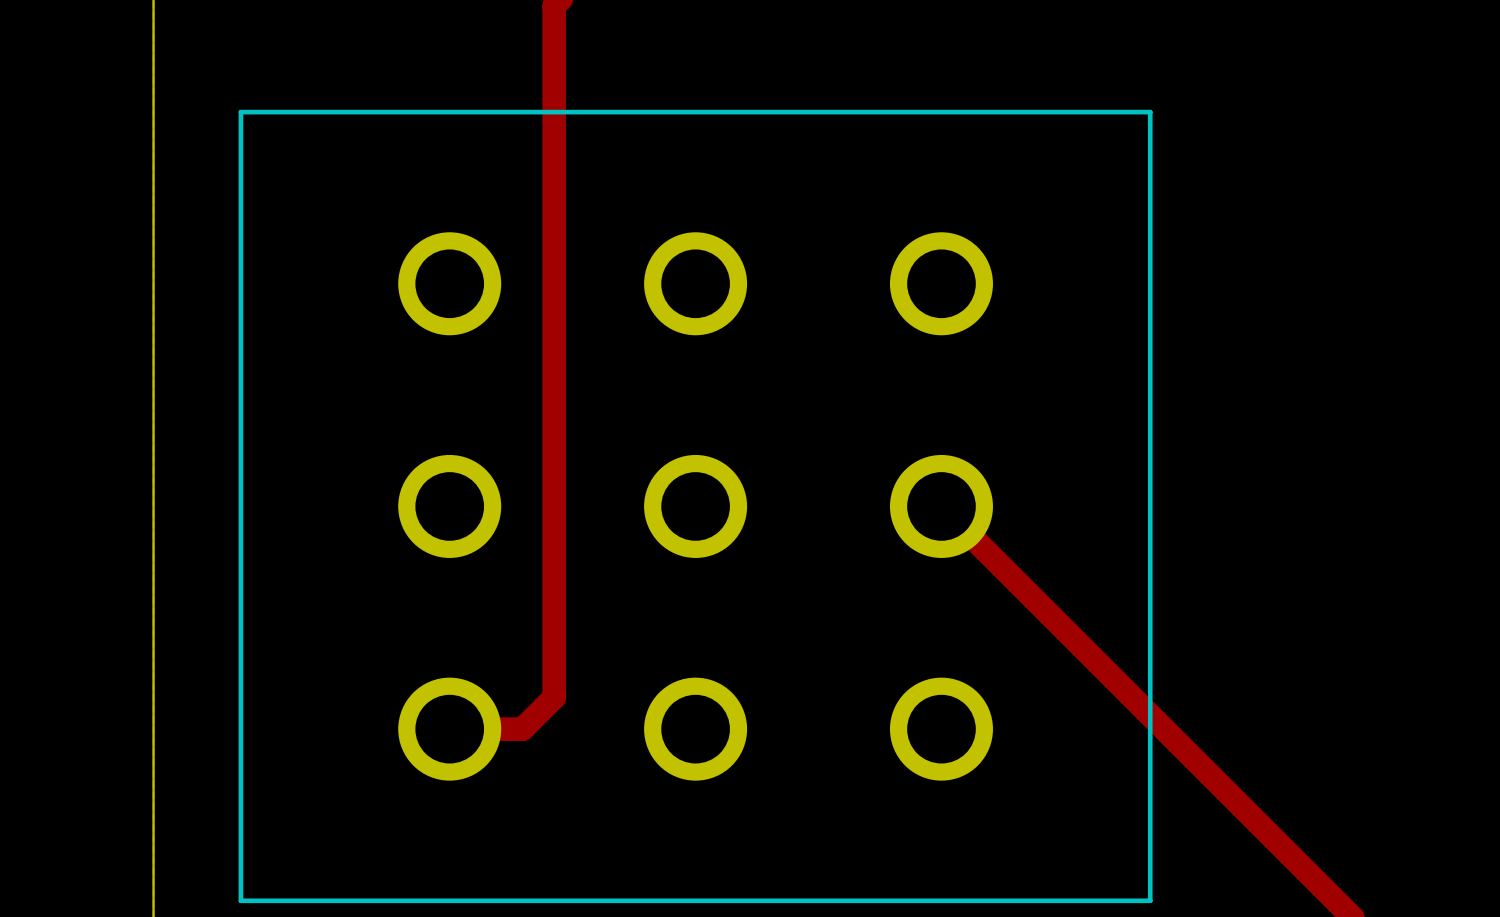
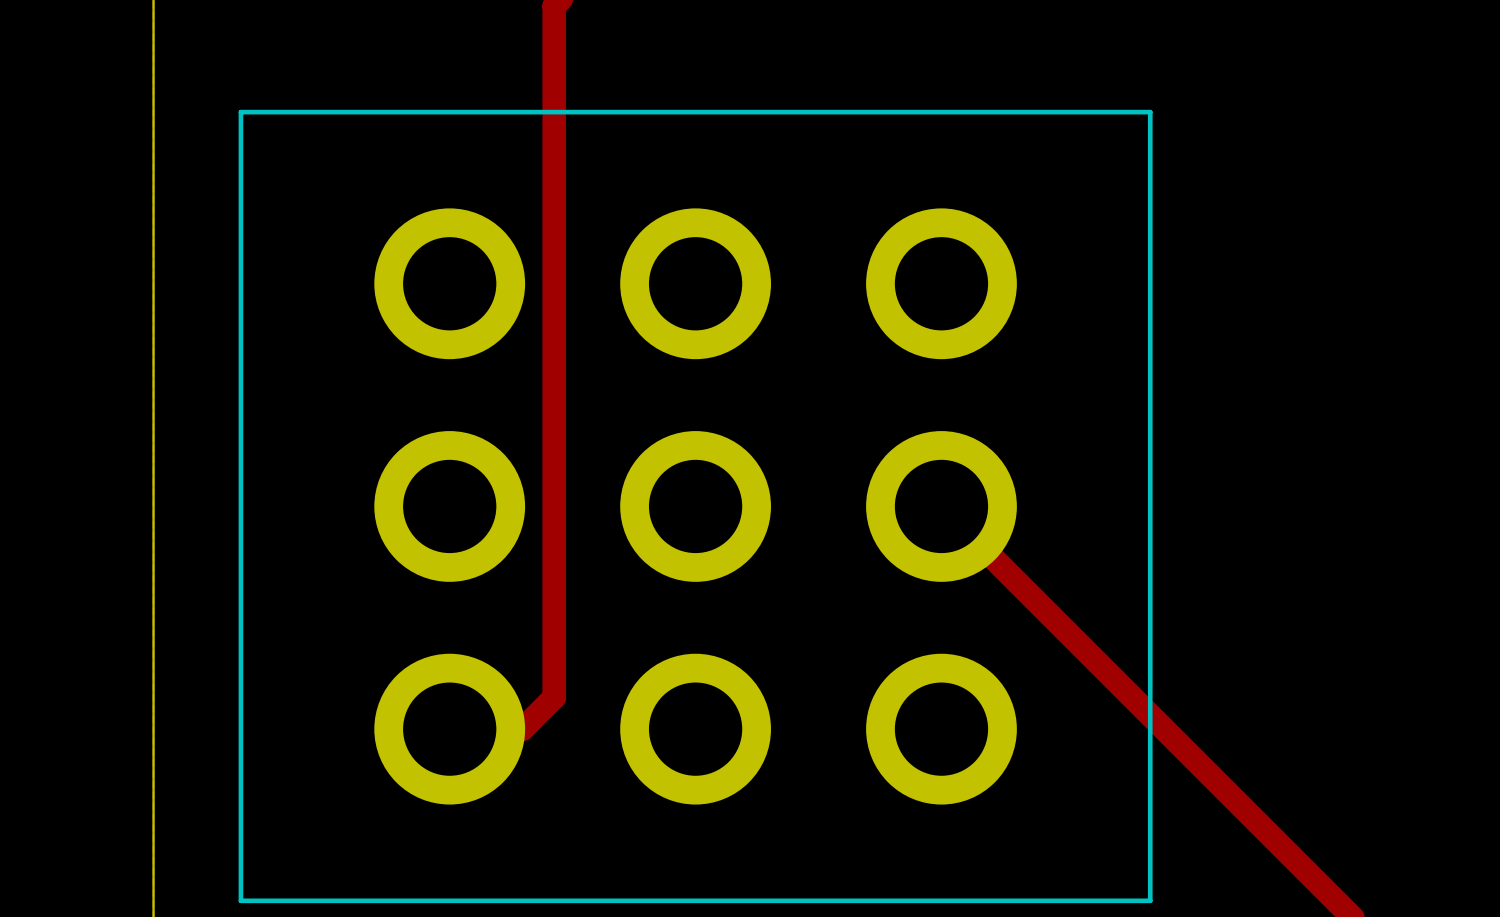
part footprint: [238, 109, 1153, 904] -> [238, 109, 1153, 904]

